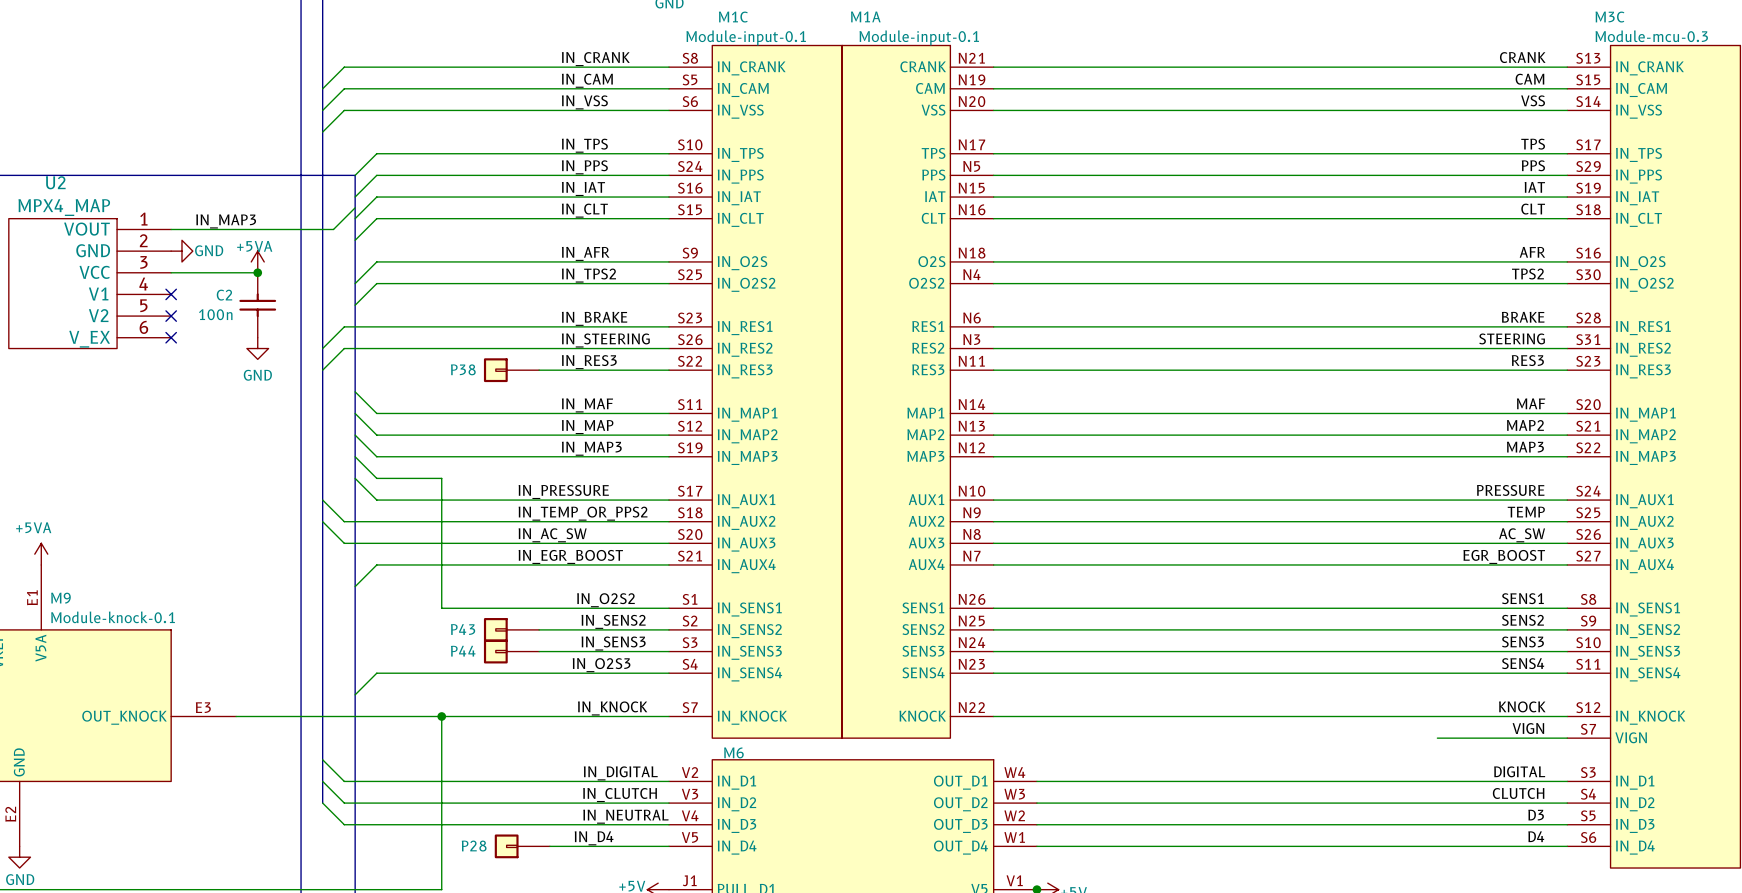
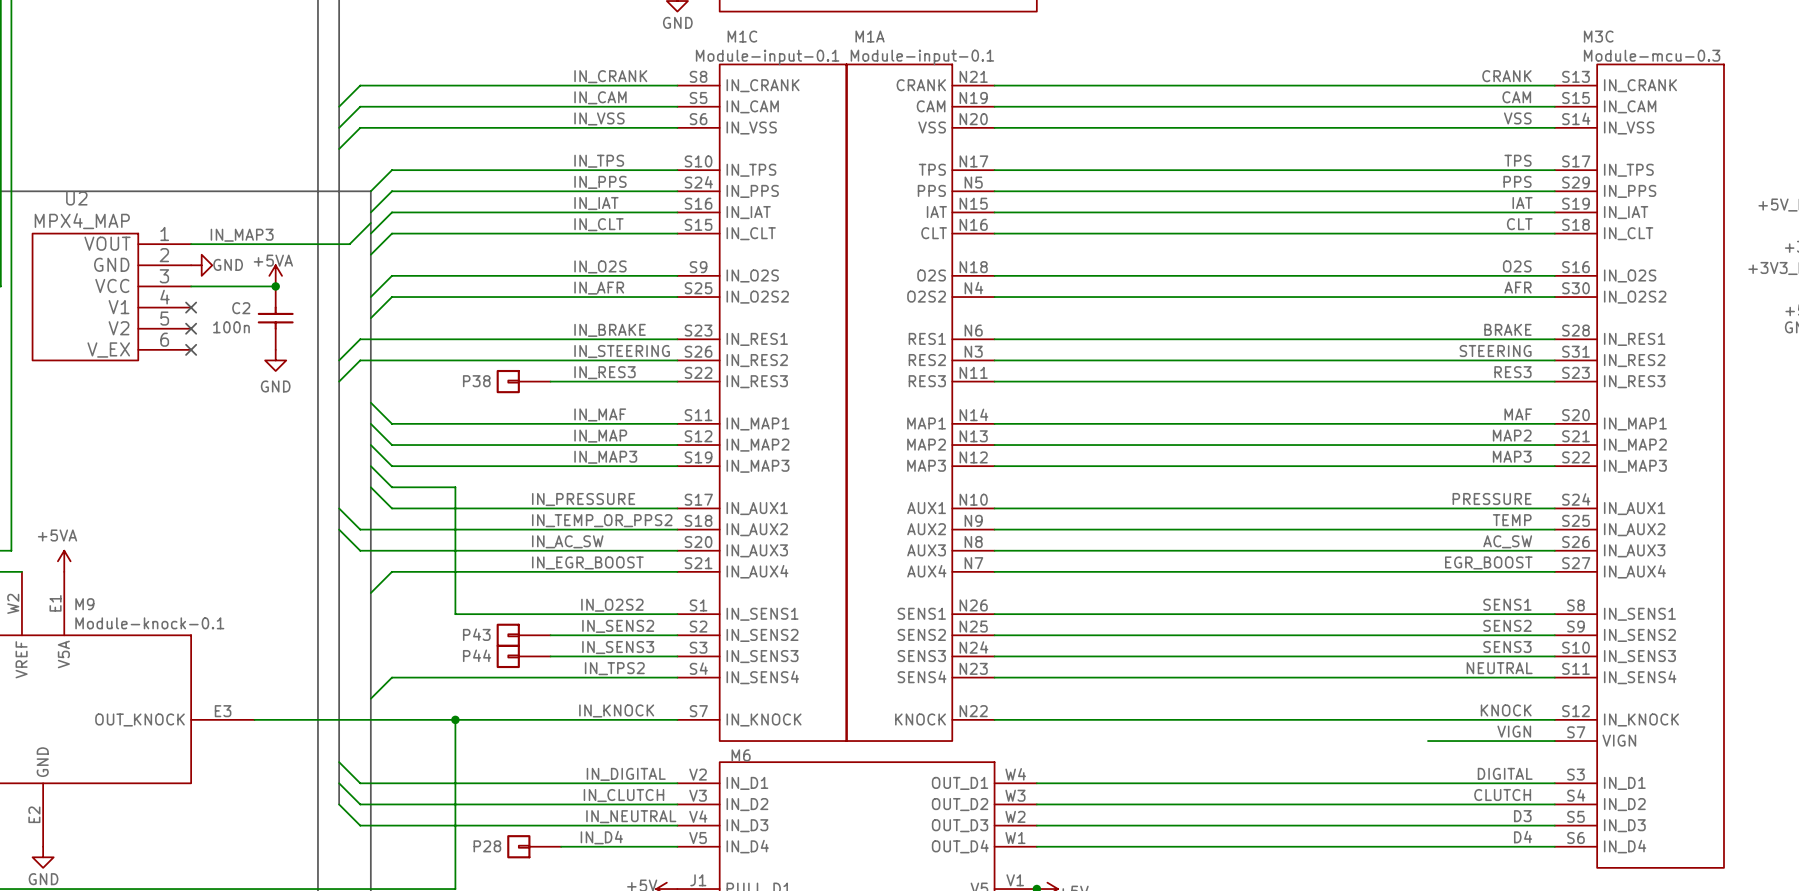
label: AFR (1532, 252) -> O2S (1517, 266)
label: IN_AFR (585, 253) -> IN_O2S (600, 266)
label: TPS2 (1527, 274) -> AFR (1518, 287)
label: IN_TPS2 (588, 275) -> IN_AFR (599, 288)
label: SENS4 (1523, 663) -> NEUTRAL (1499, 668)
label: IN_O2S3 (601, 665) -> IN_TPS2 (614, 668)

